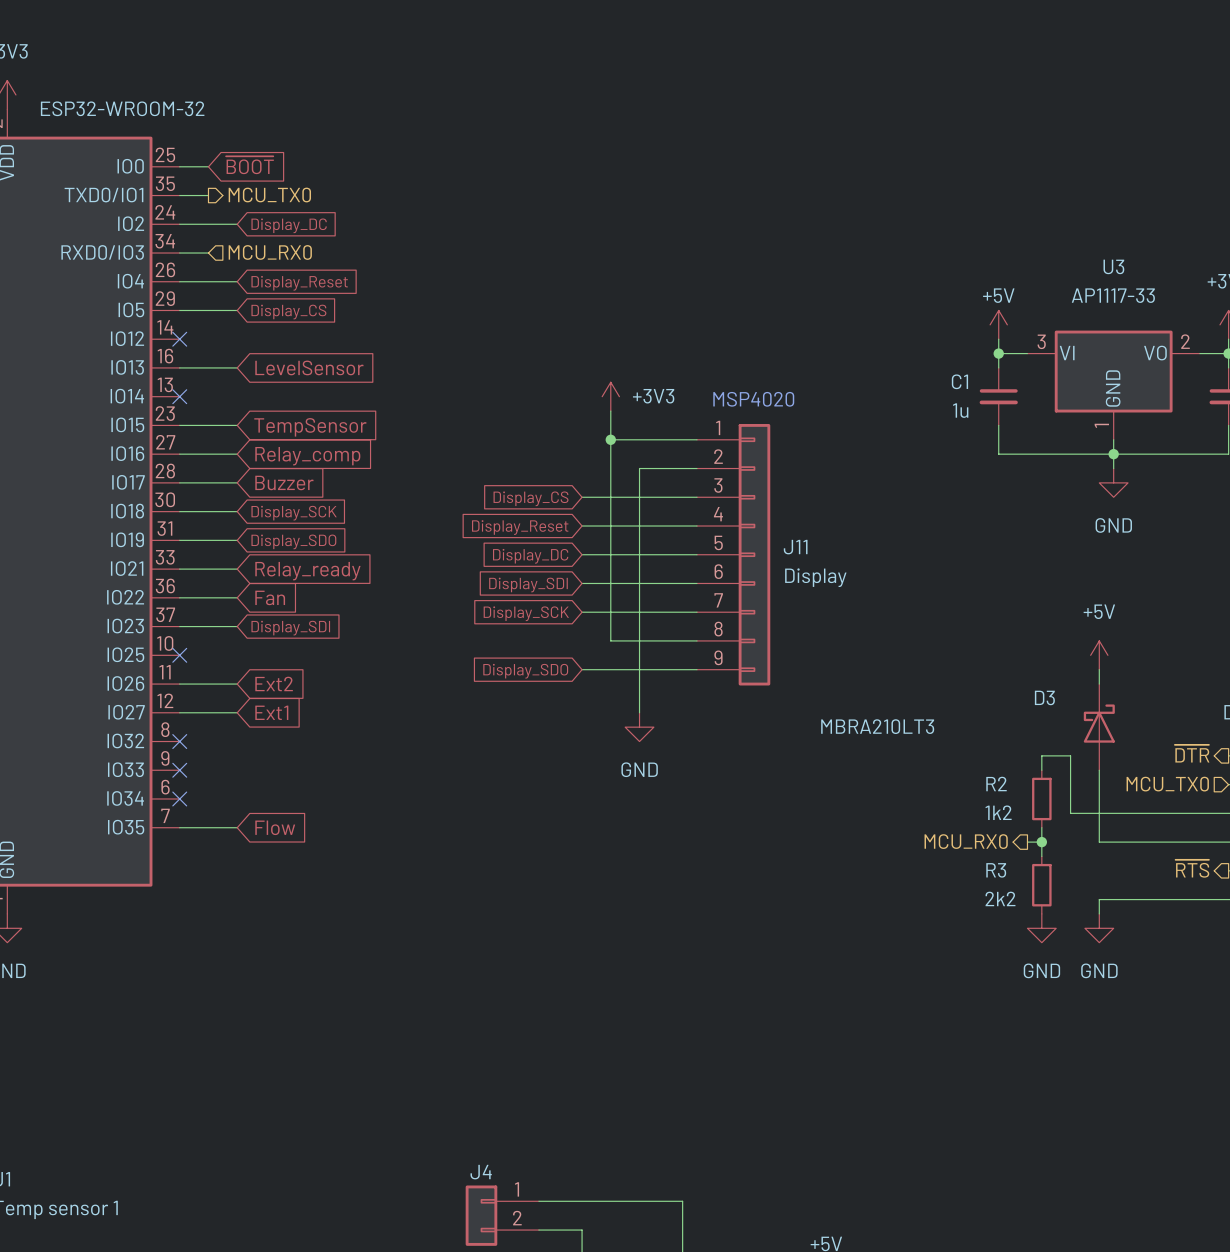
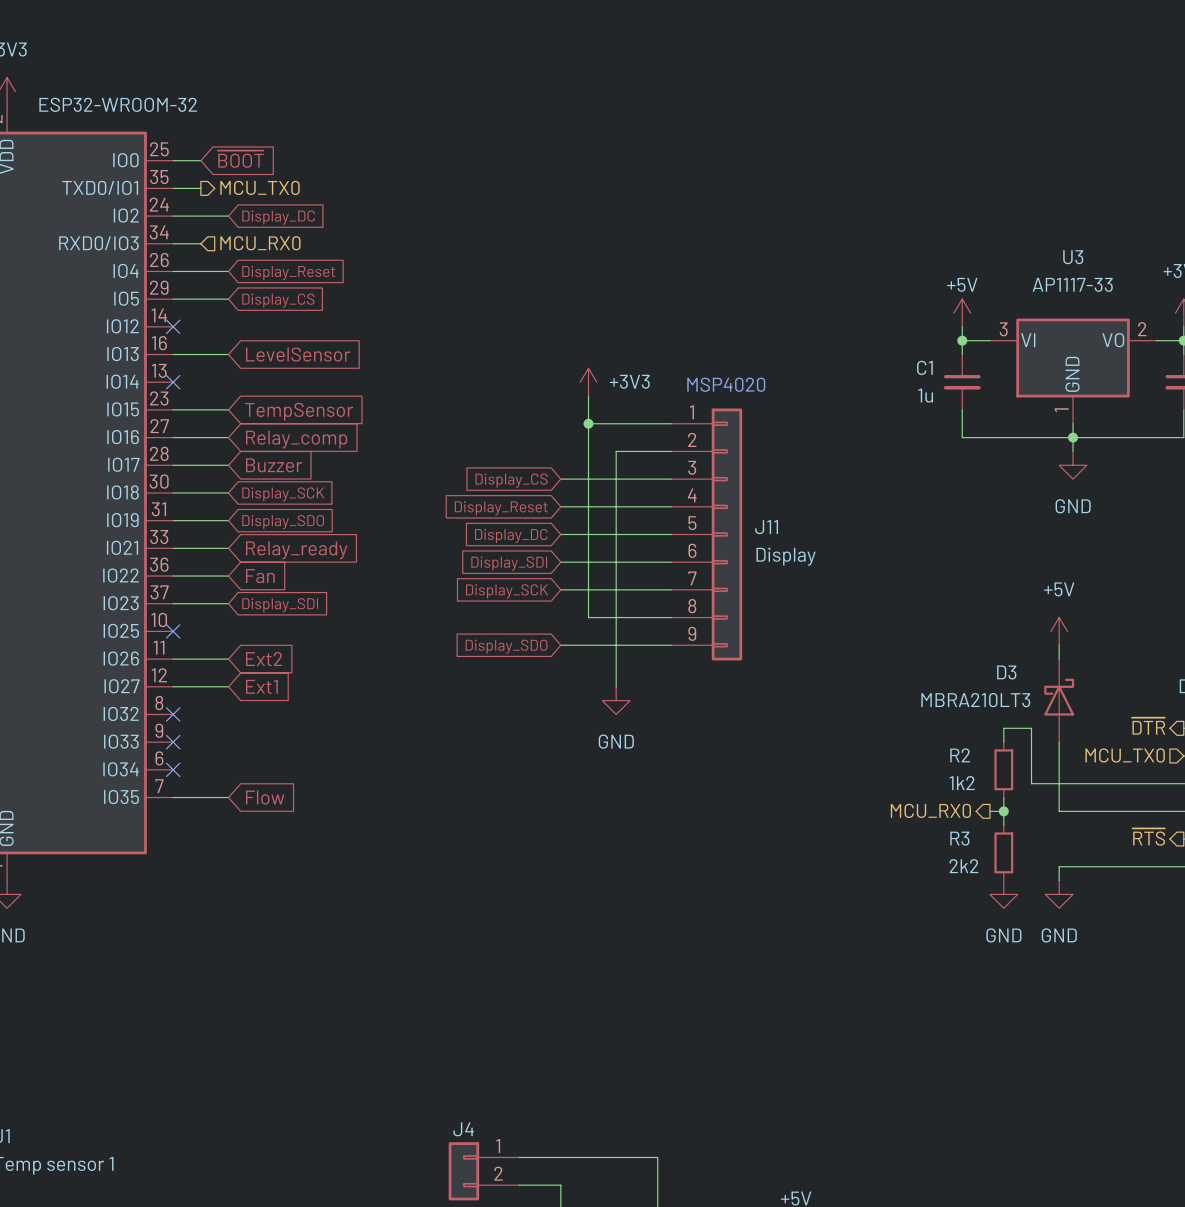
D3 value position: MBRA210LT3 (877, 726) -> MBRA210LT3 (975, 700)

